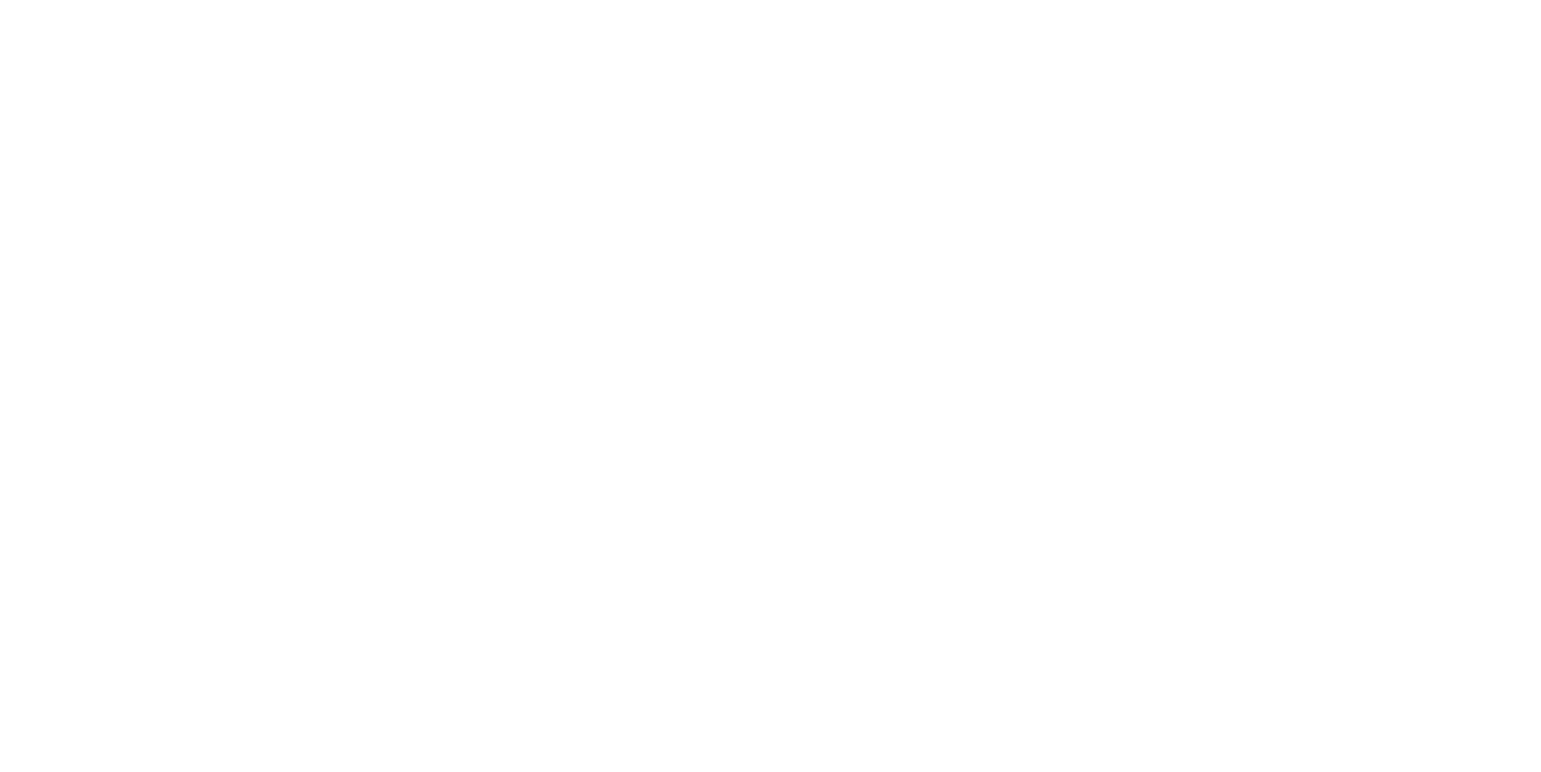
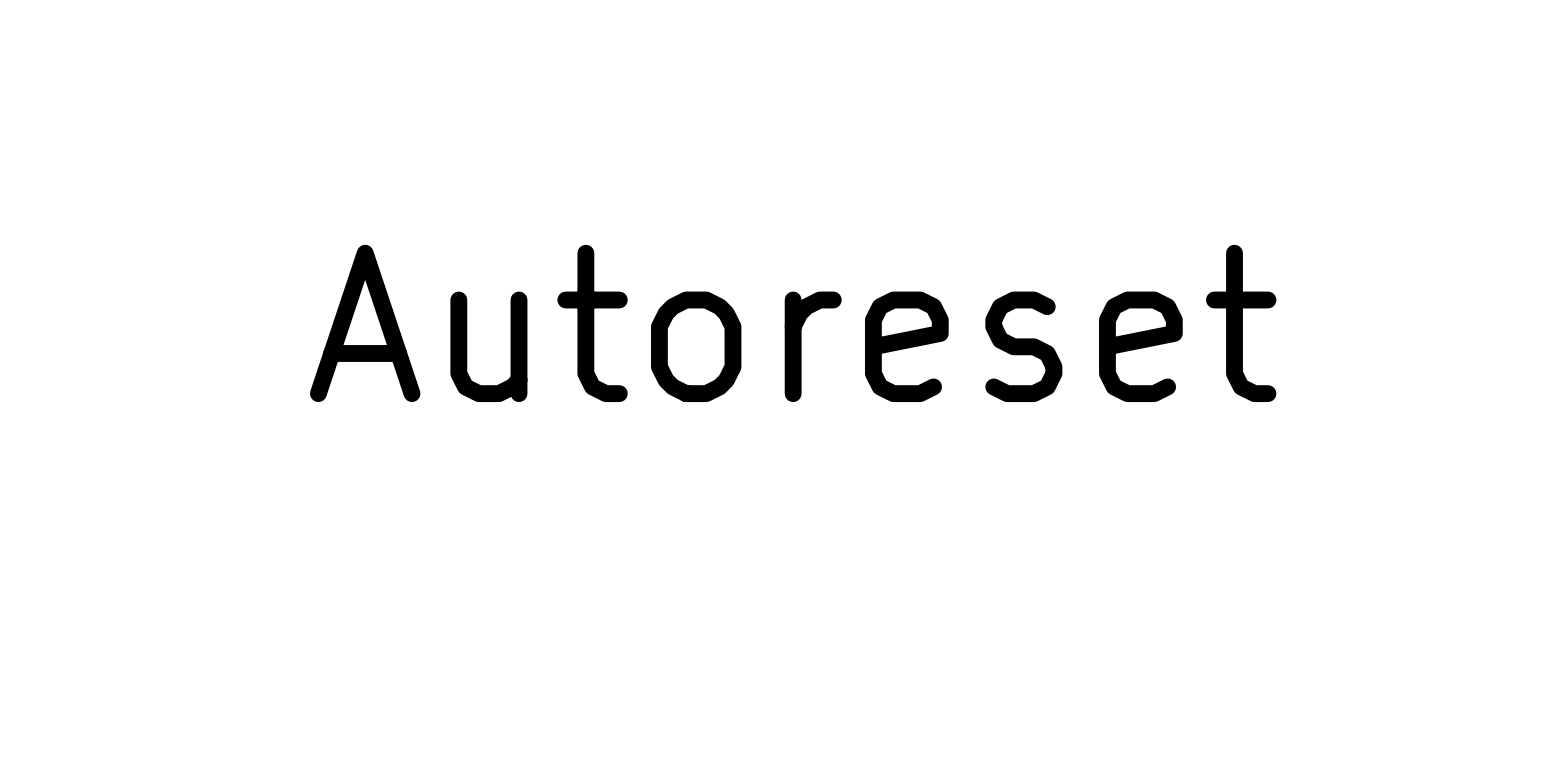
text: none -> Autoreset (793, 323)

